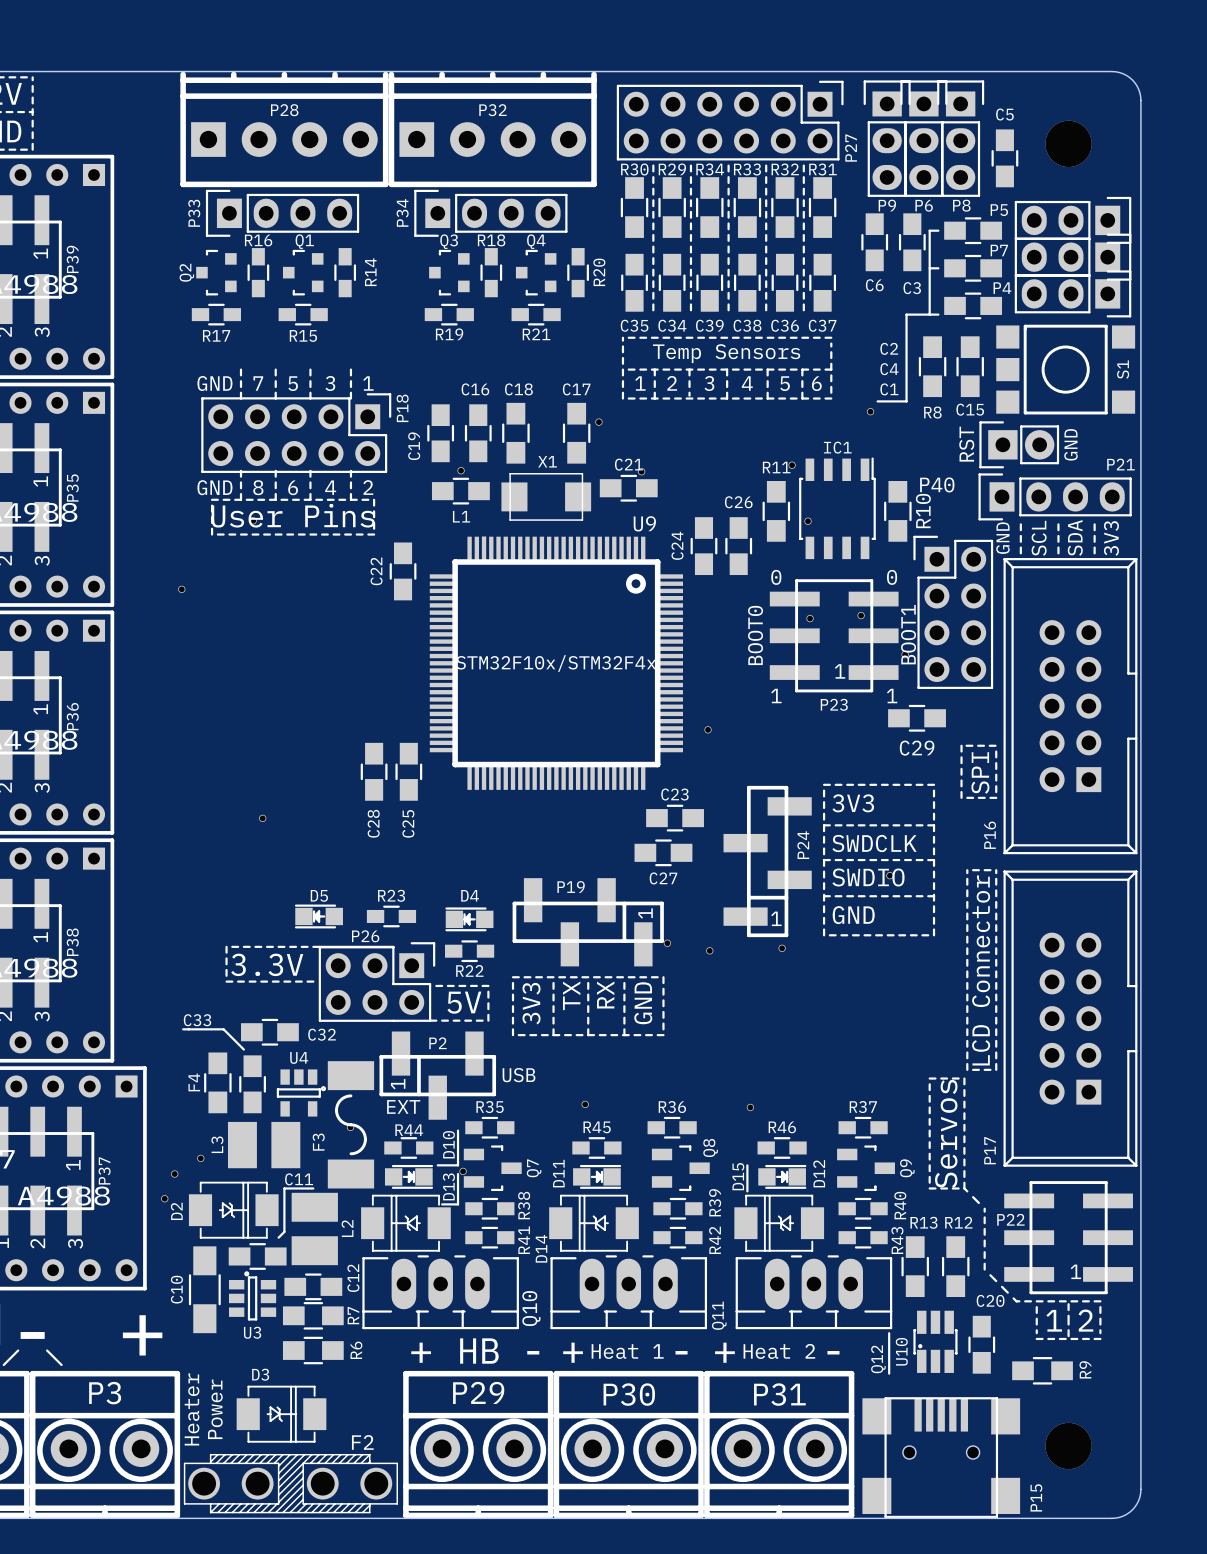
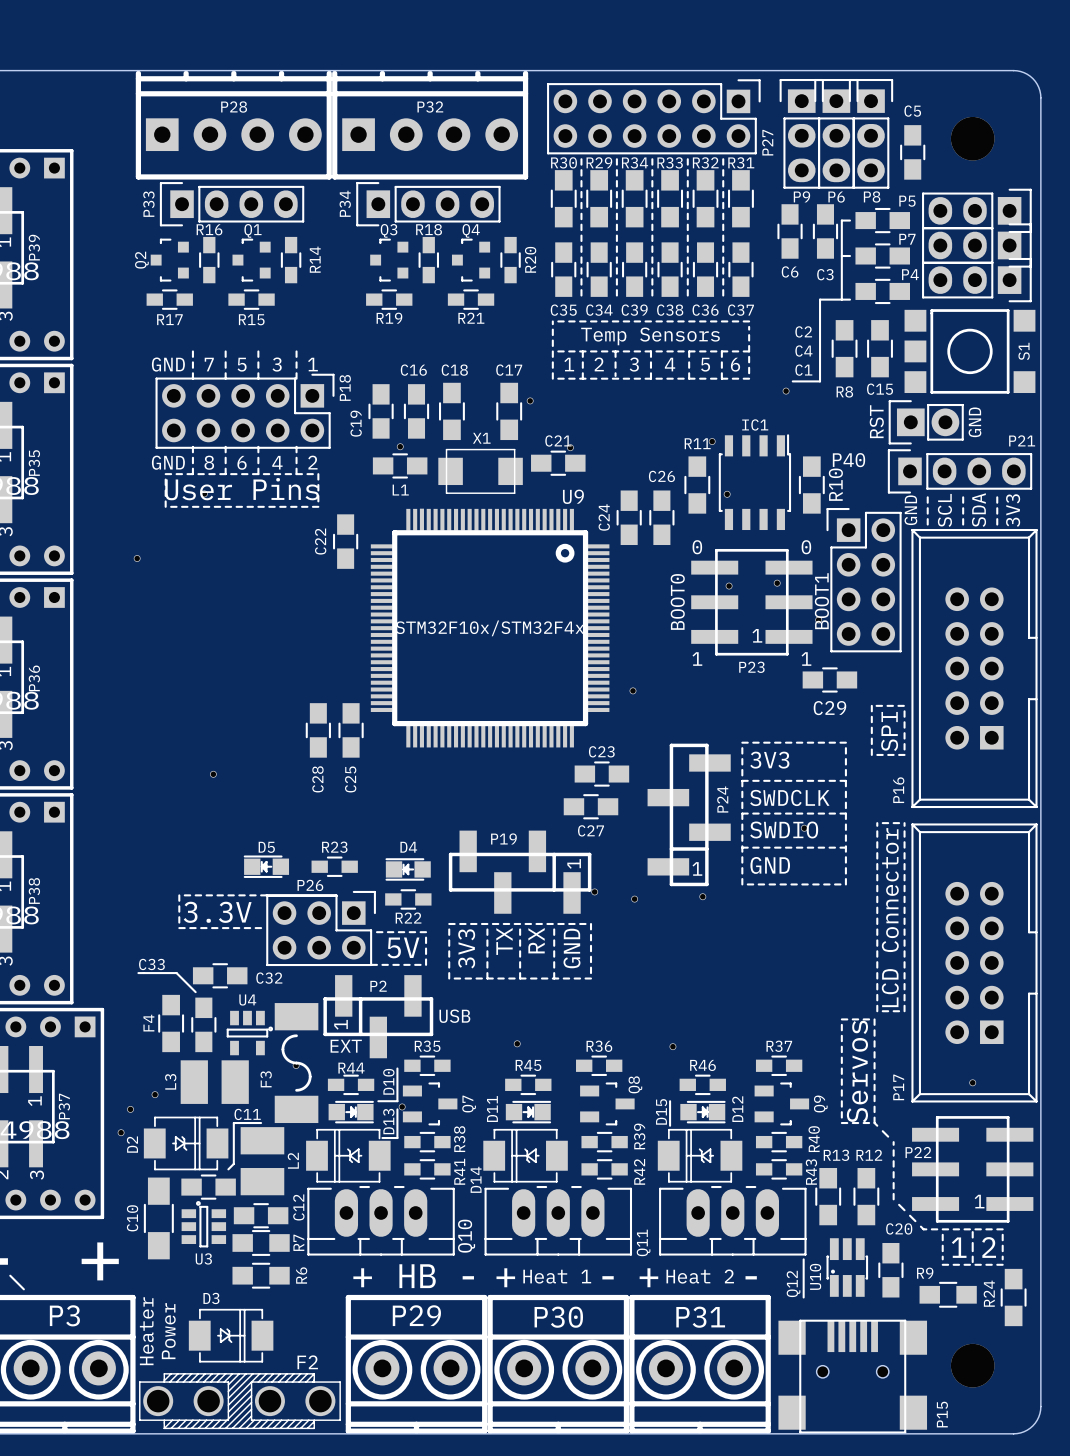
part: none -> (972, 1082)
R9 name rotation: 0° (1085, 1369) -> 90° clockwise (925, 1273)
R9 name position: R9 (1085, 1369) -> R9 (925, 1273)
R24: none -> (1013, 1297)

